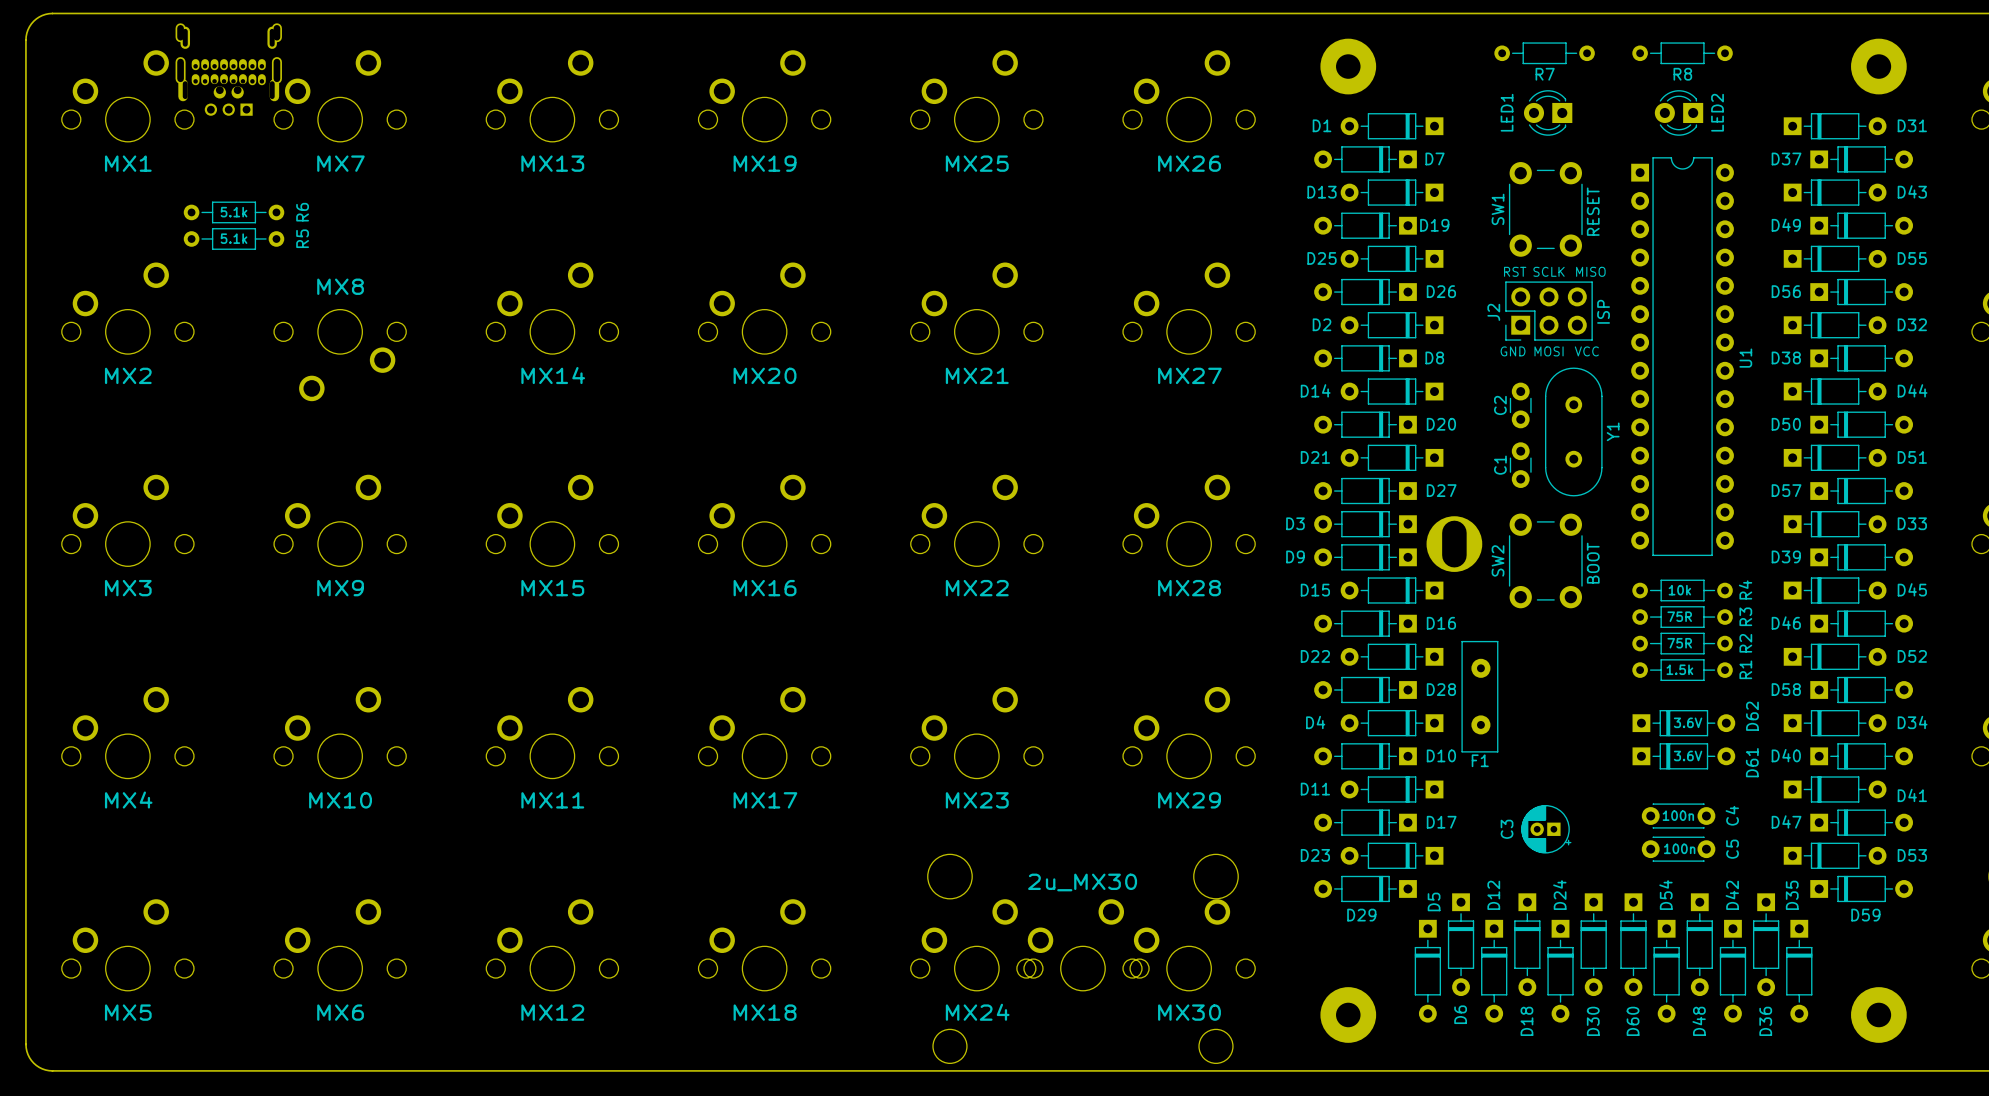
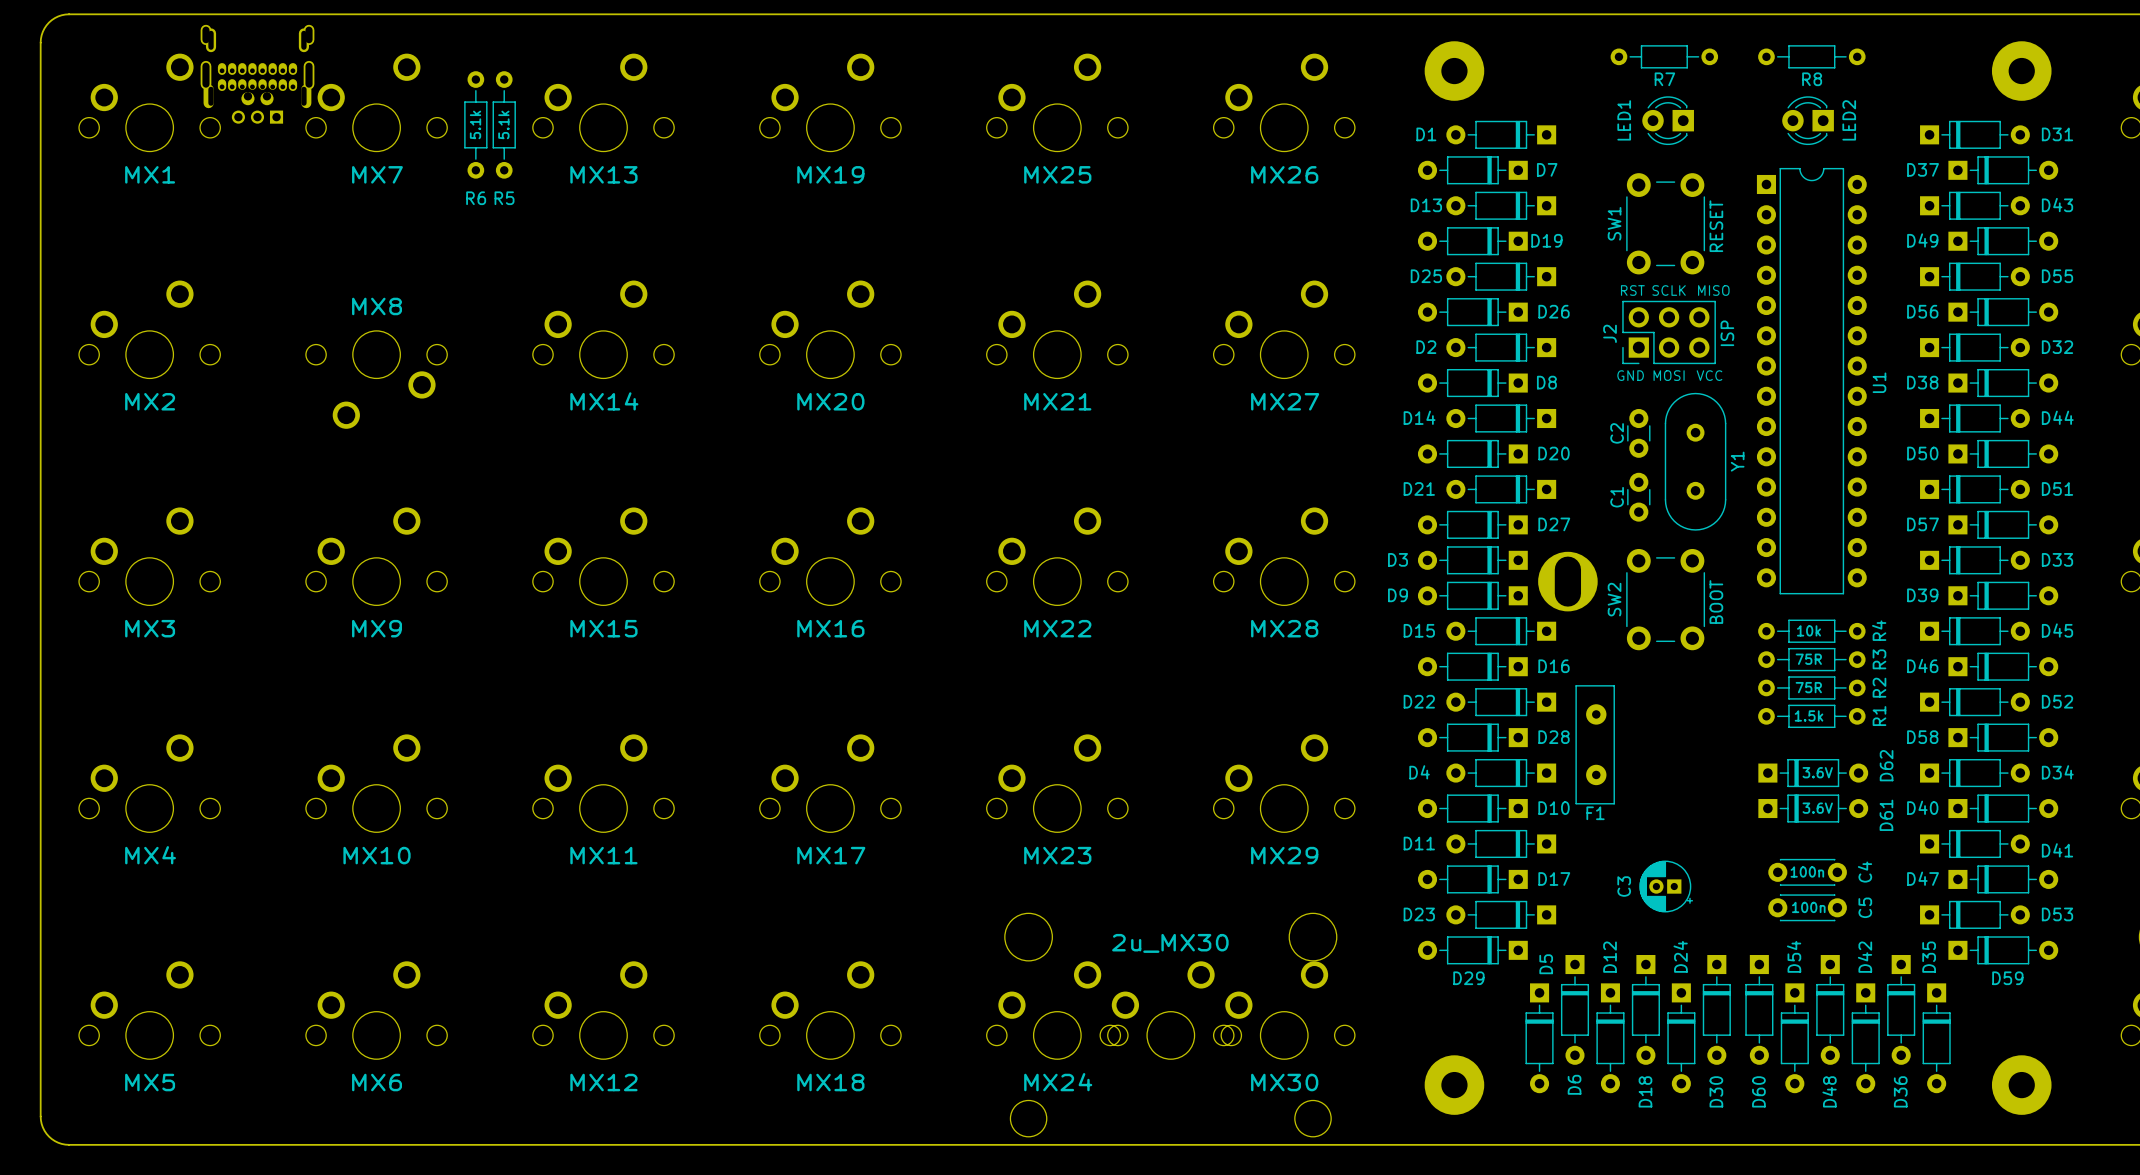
R6 rotation: 0° (234, 212) -> 90° clockwise (475, 124)
R6 position: (234, 212) -> (475, 124)
R5 rotation: 0° (234, 238) -> 90° clockwise (504, 124)
R5 position: (234, 238) -> (504, 124)

